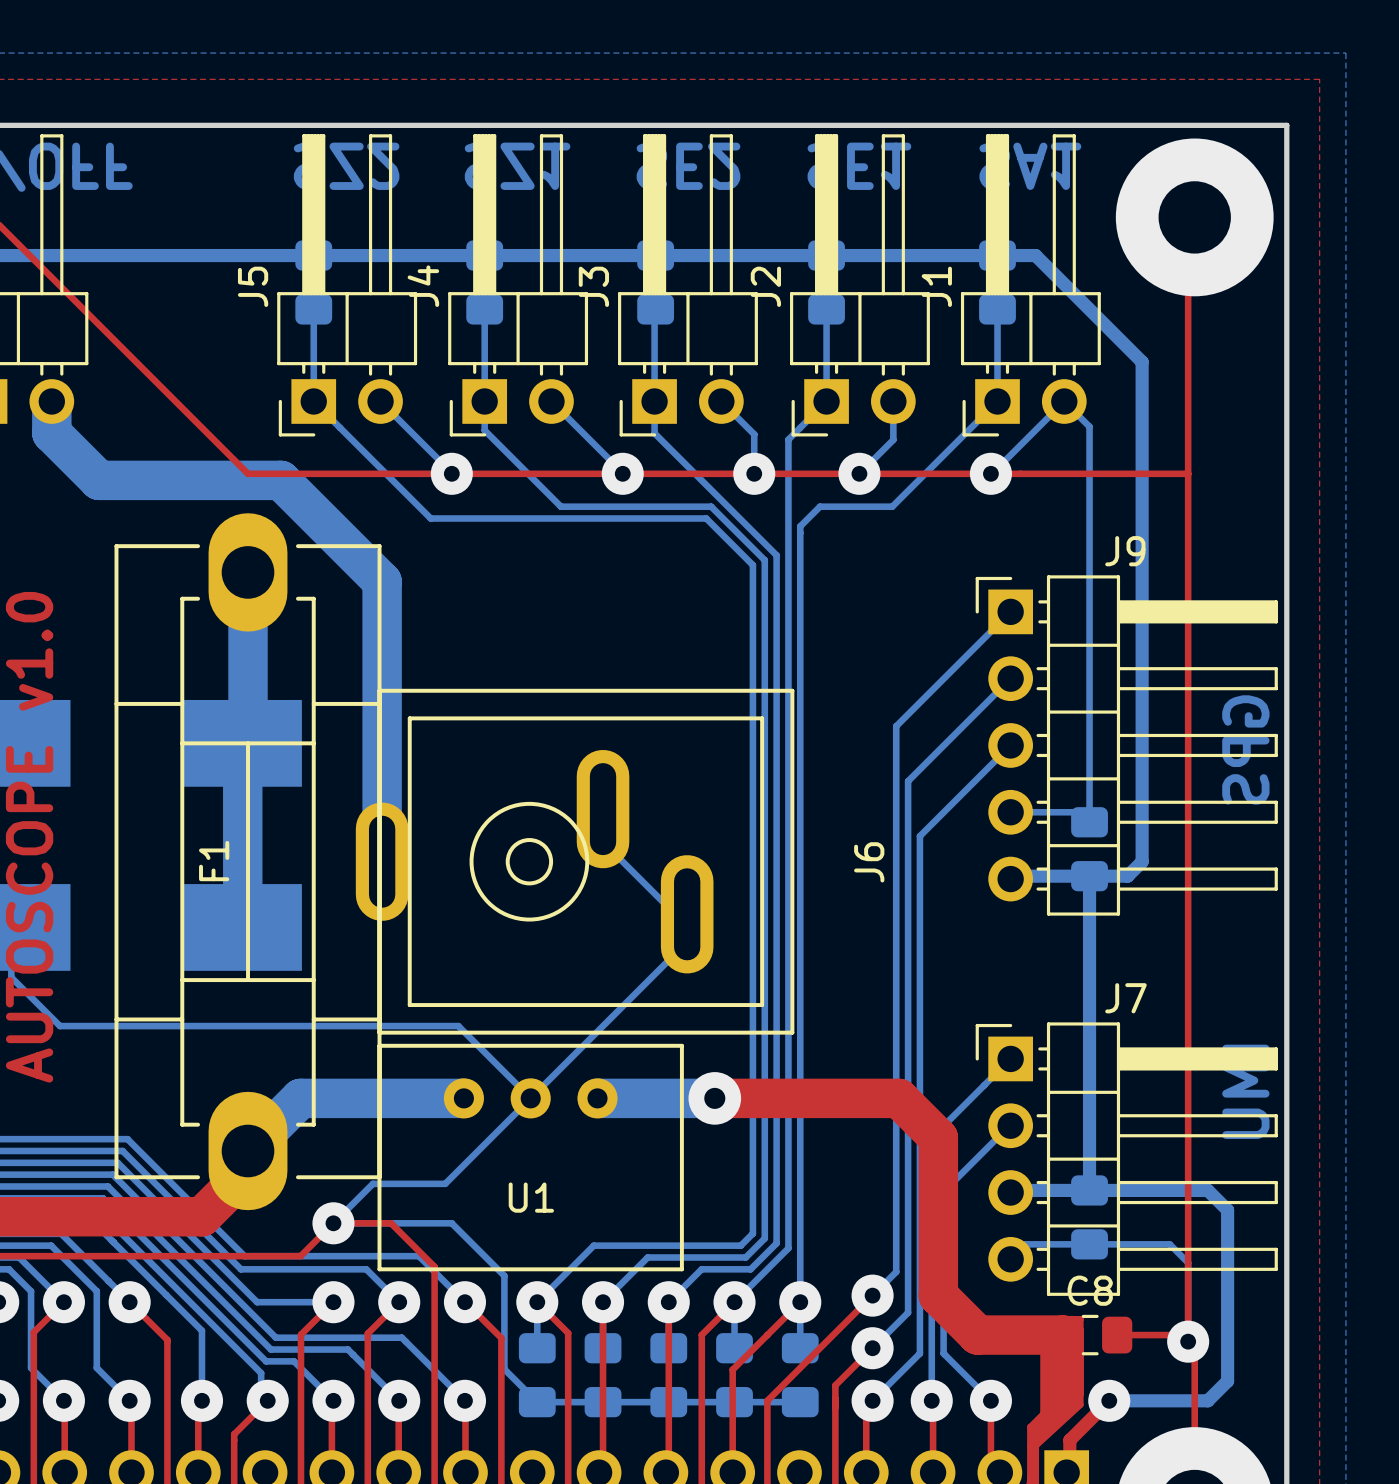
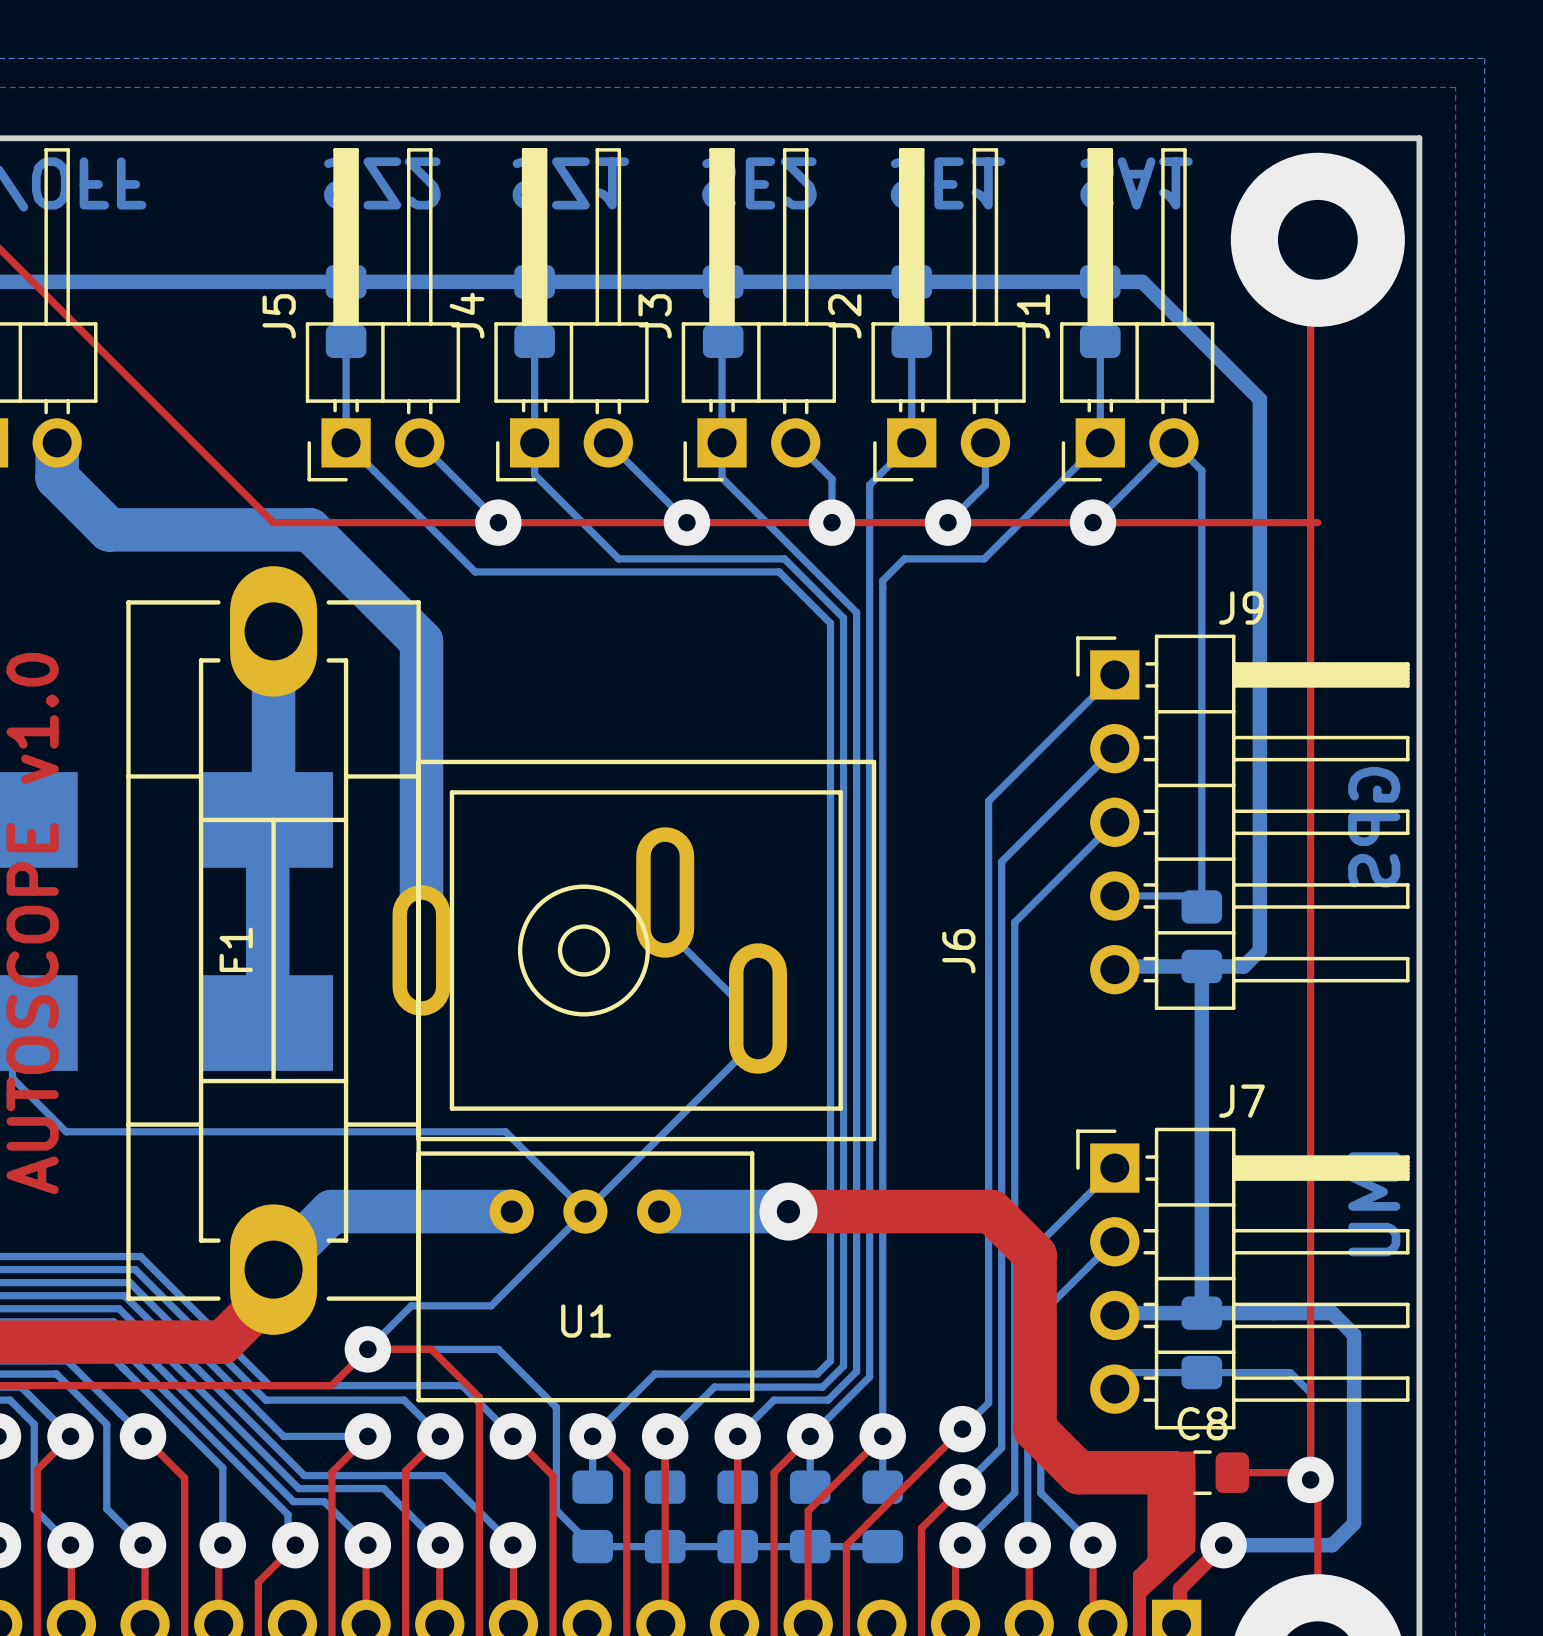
top track: none -> (1310, 522) (1317, 522)

